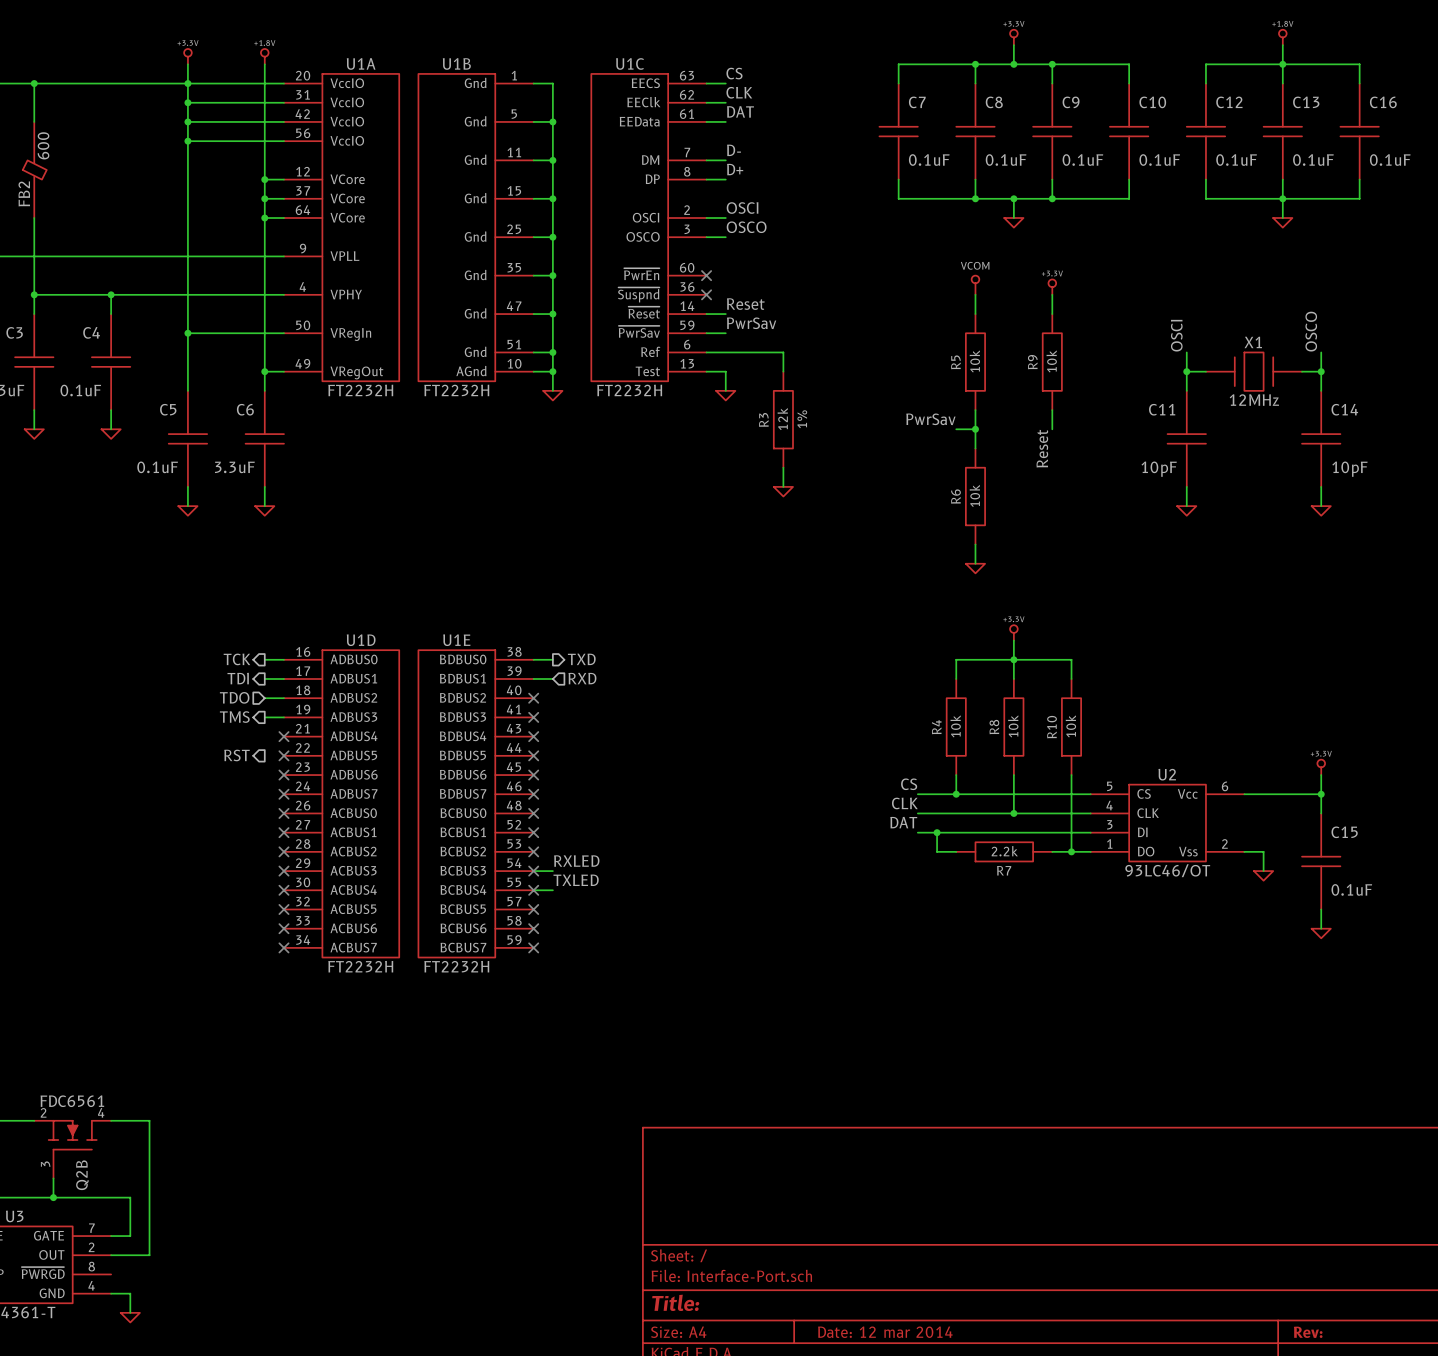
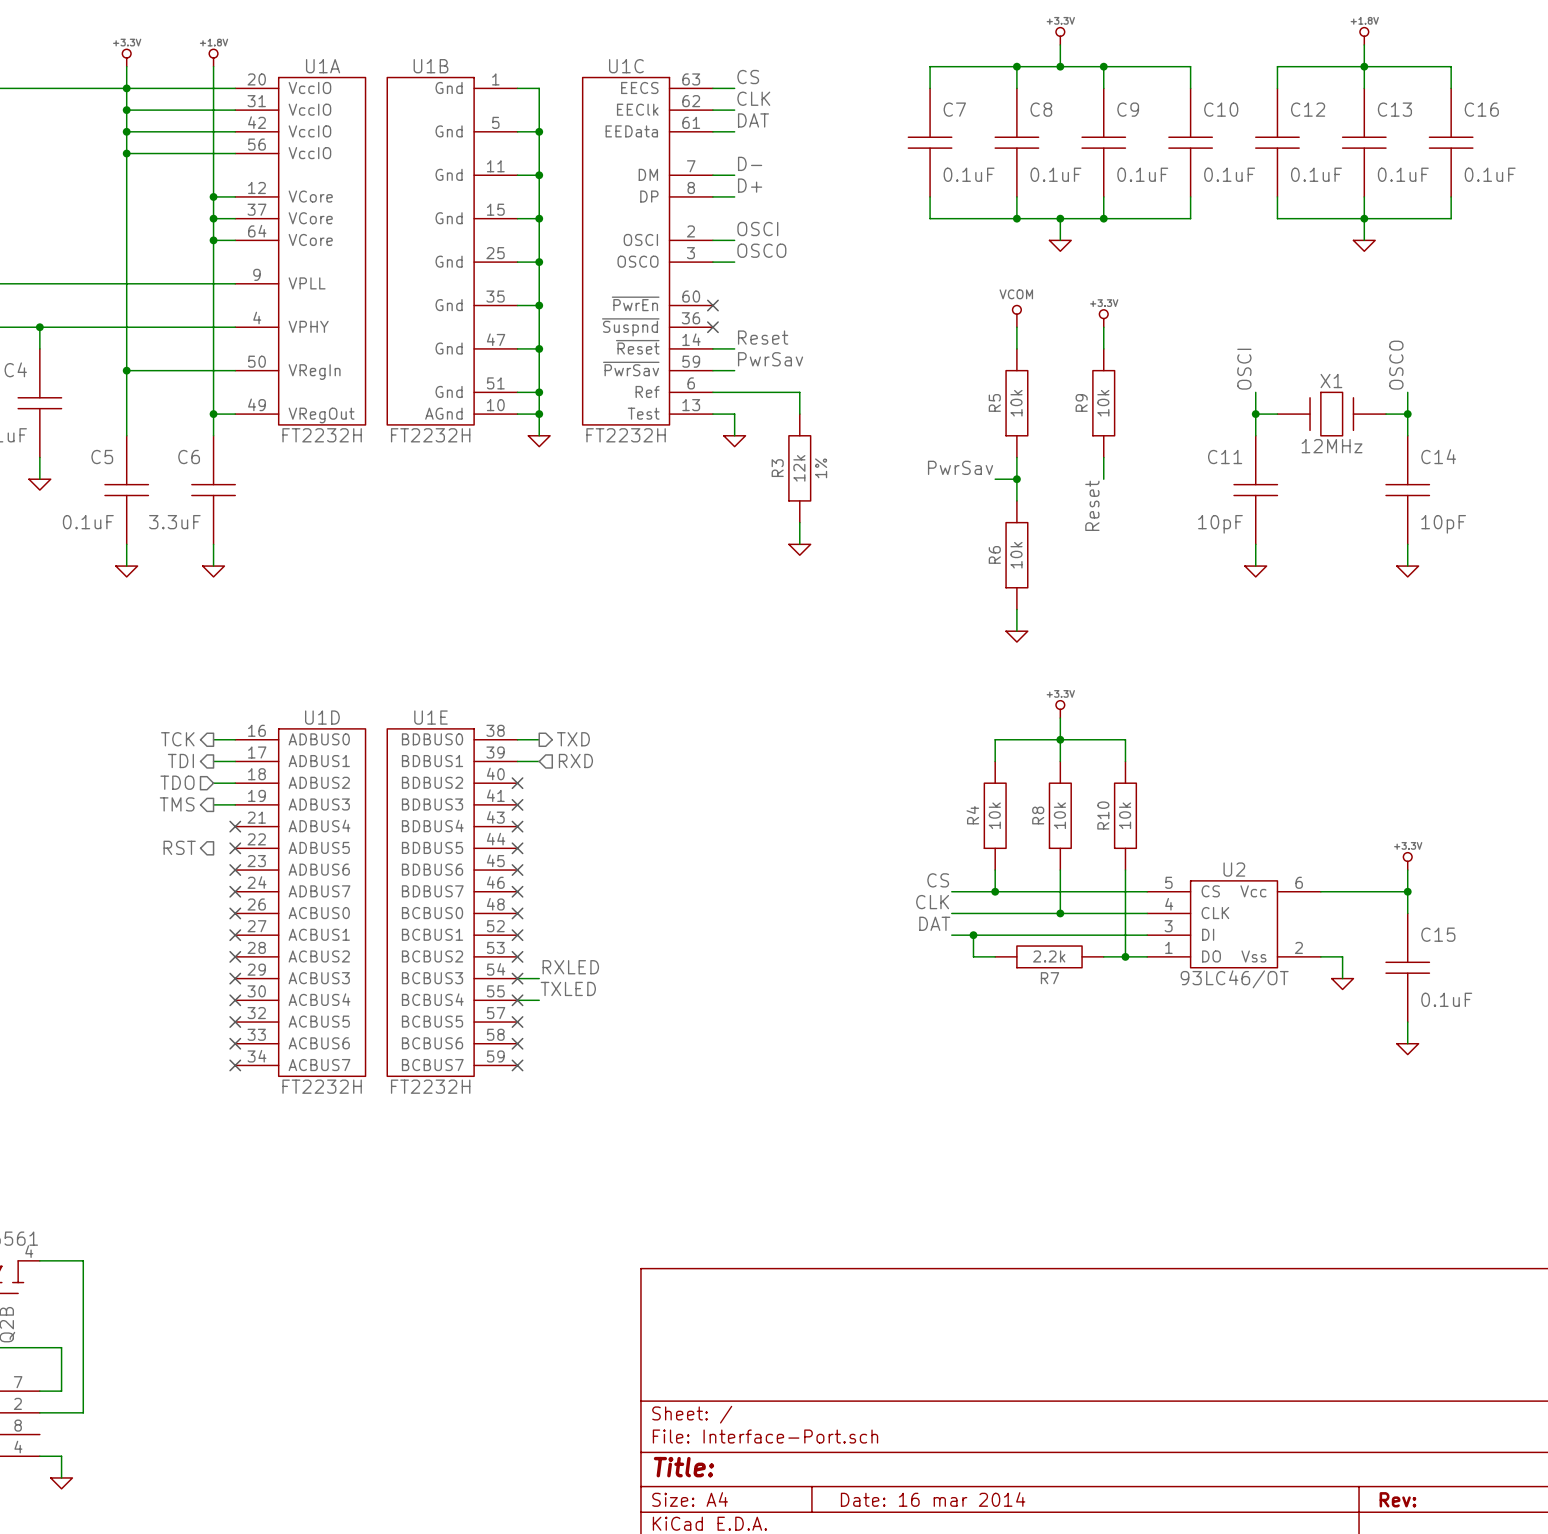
title block: Date: 12 mar 2014 (885, 1332) -> Date: 16 mar 2014 (933, 1499)

